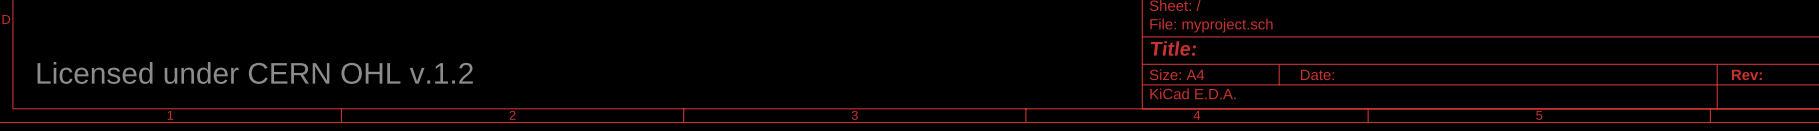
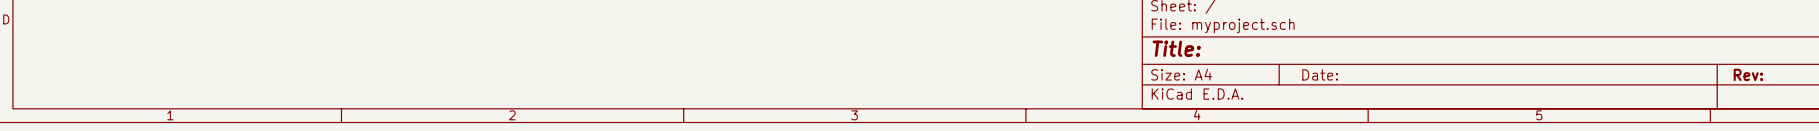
text: Licensed under CERN OHL v.1.2 (255, 72) -> none

